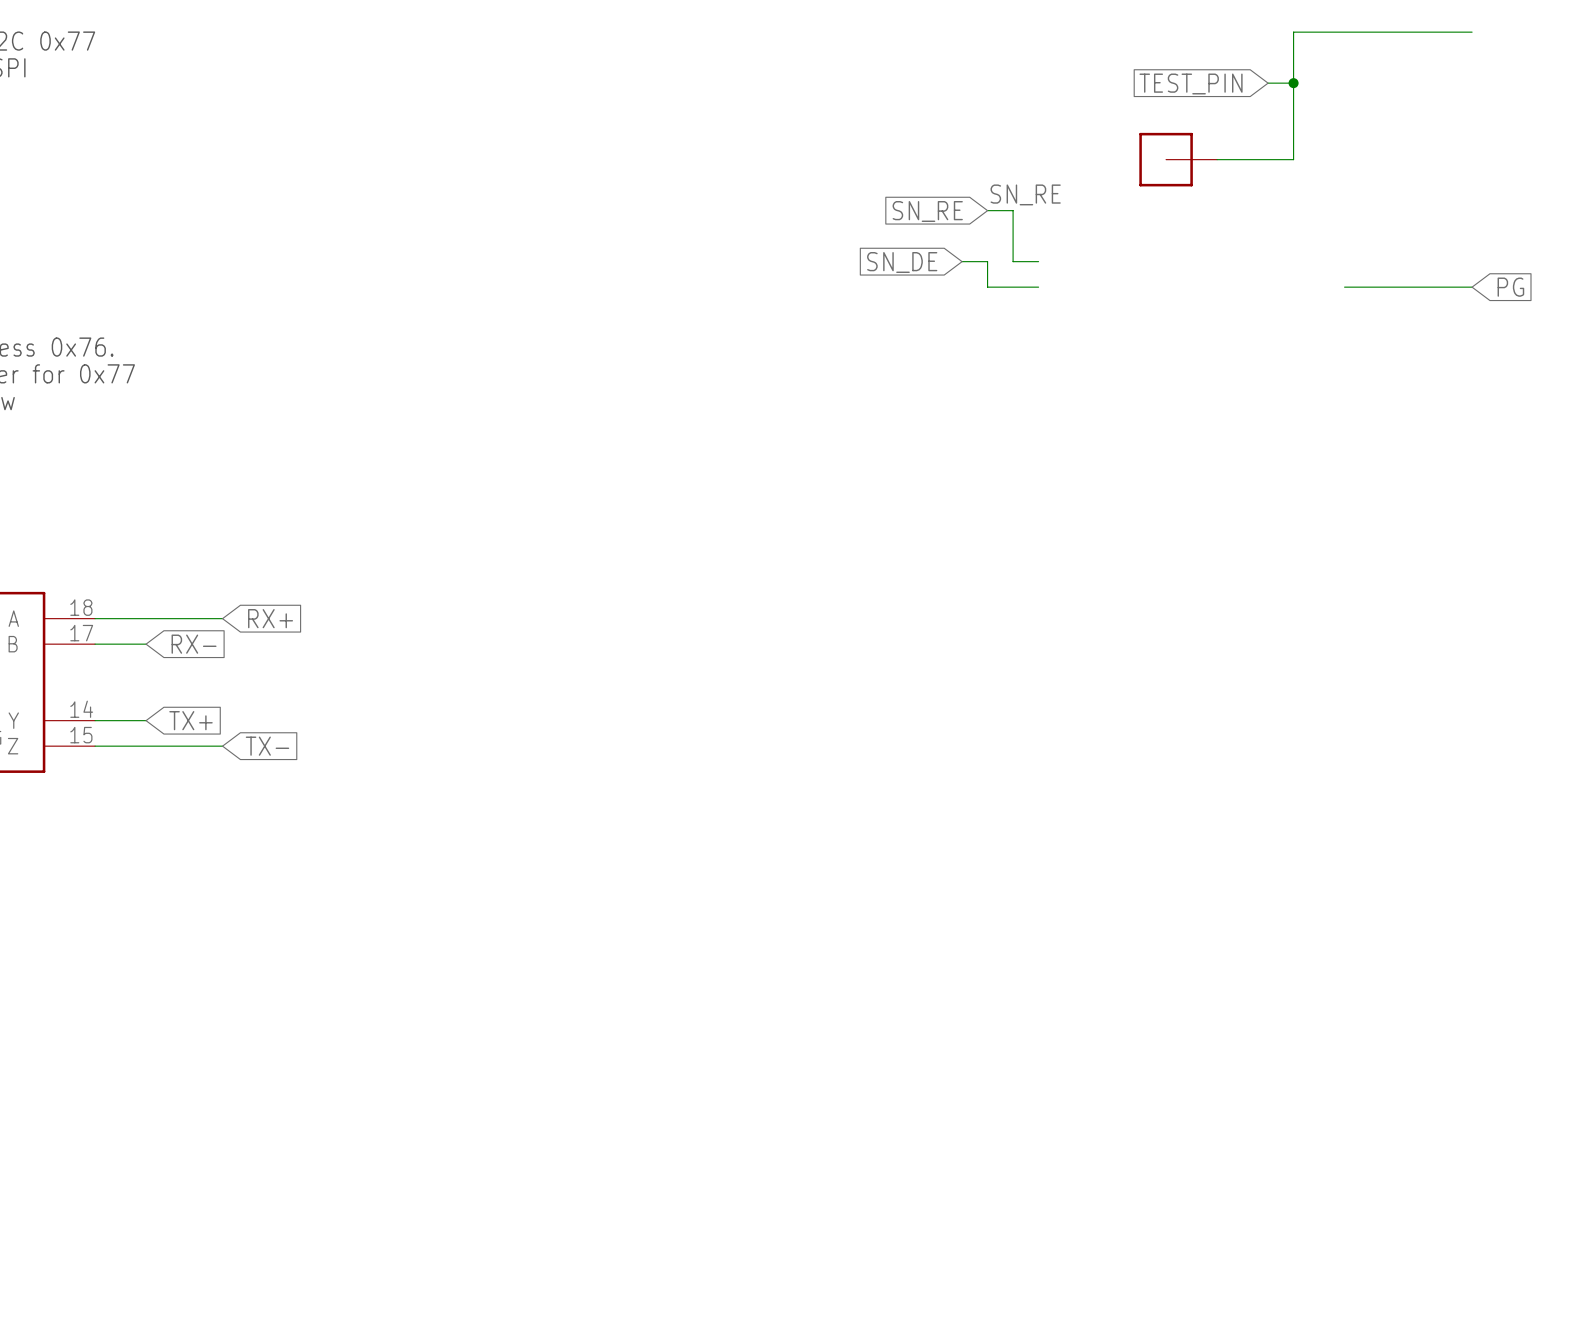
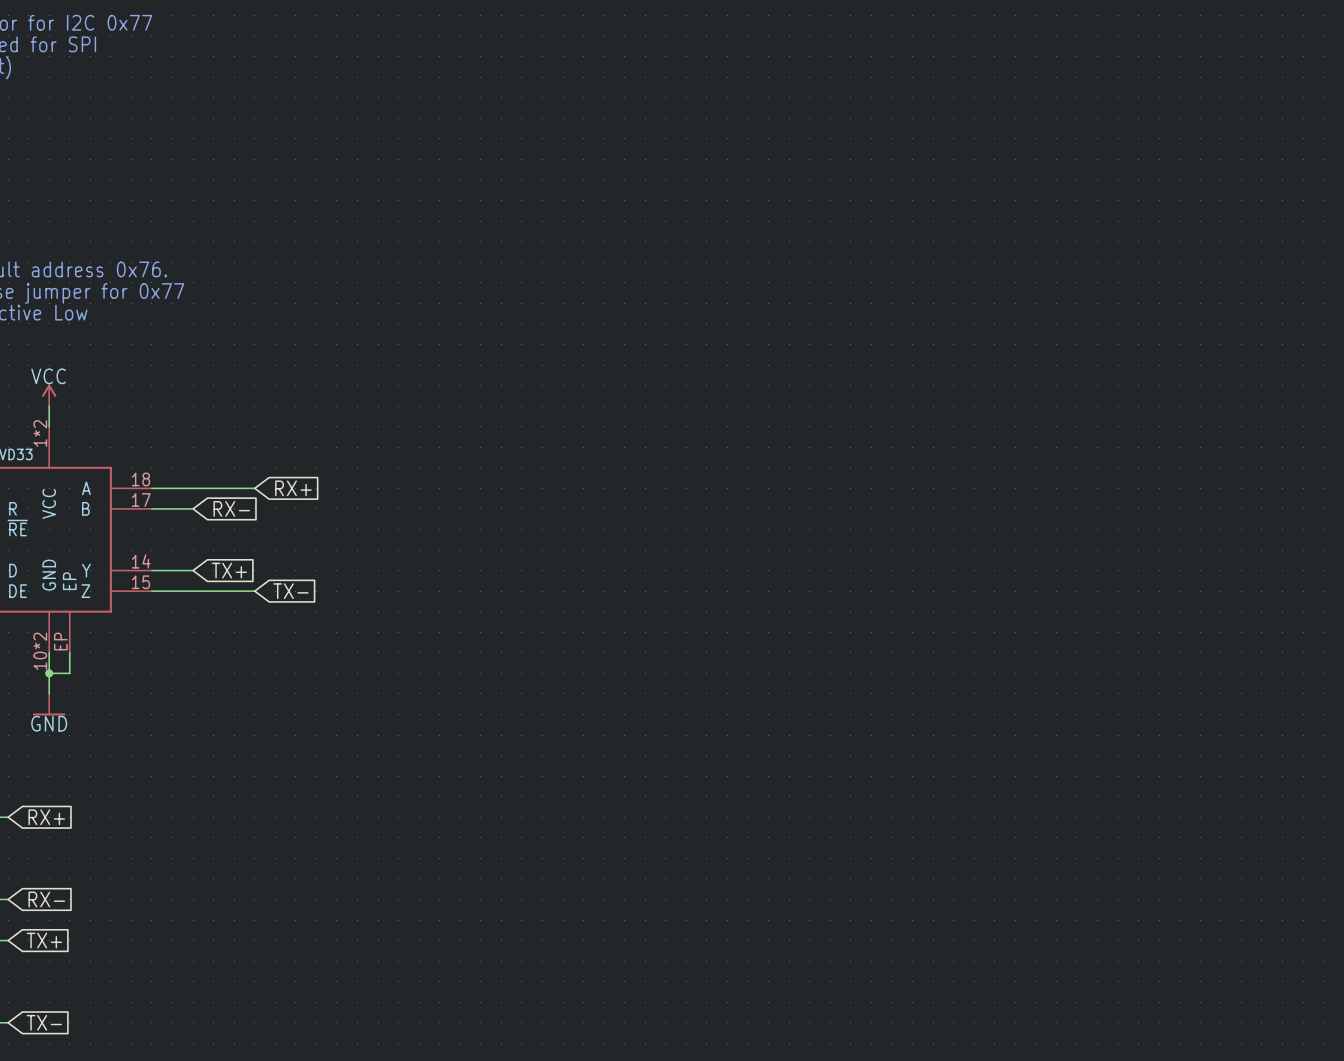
wire: (1472, 32) (1293, 32) (1293, 159) (1217, 159) -> none
global label: TEST_PIN (1191, 83) -> none
wire: (1268, 83) (1293, 83) -> none
junction: (1293, 83) -> none
part: (1178, 159) -> none
label: SN_RE (1025, 194) -> none
wire: (987, 210) (1013, 210) (1013, 261) (1038, 261) -> none
global label: SN_RE (927, 211) -> none
wire: (962, 261) (987, 261) (987, 287) (1038, 287) -> none
global label: SN_DE (902, 262) -> none
wire: (1344, 287) (1472, 287) -> none
global label: PG (1510, 287) -> none

